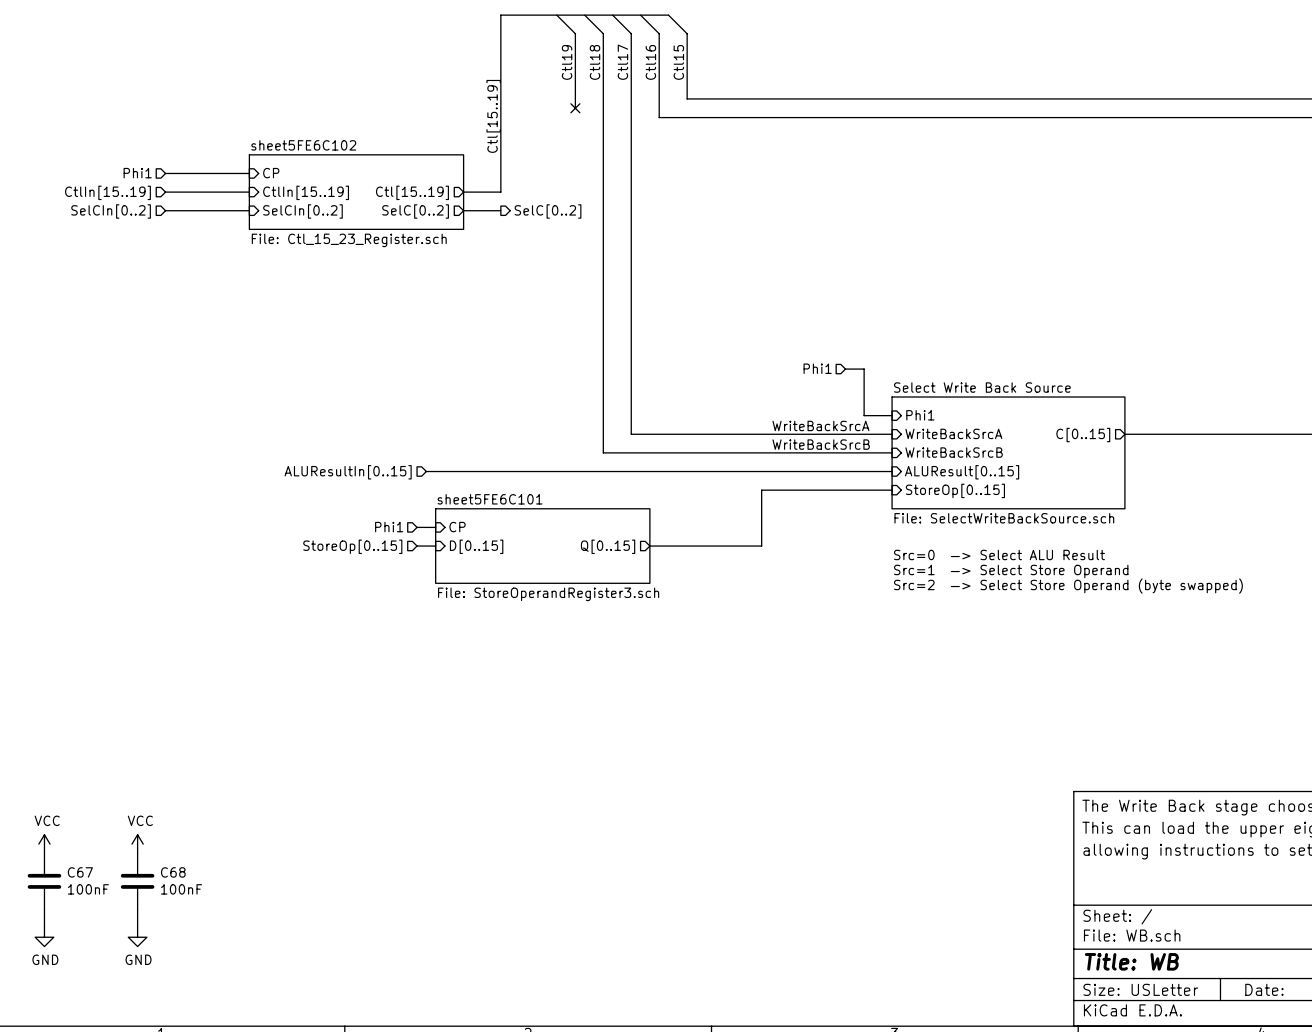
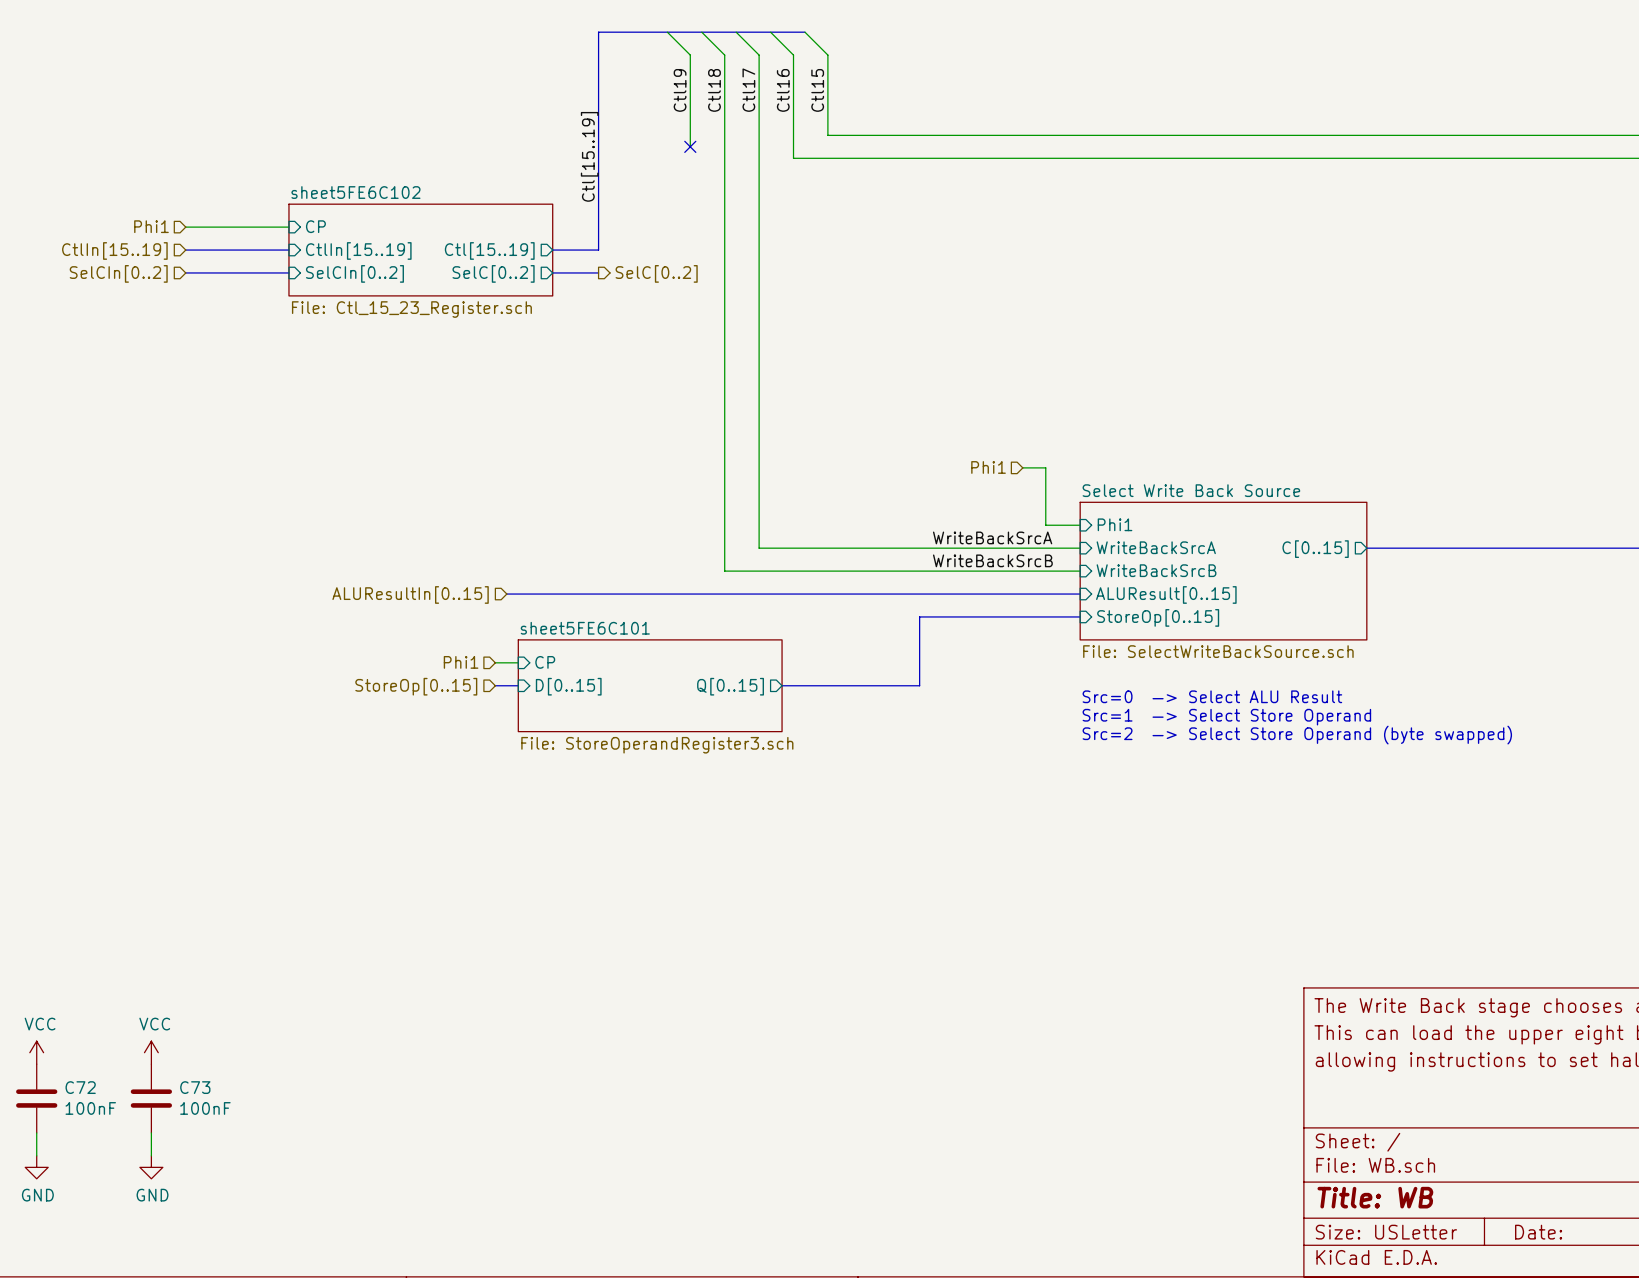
C67 name: C67 (80, 872) -> C72 (80, 1087)
C68 name: C68 (173, 872) -> C73 (195, 1087)

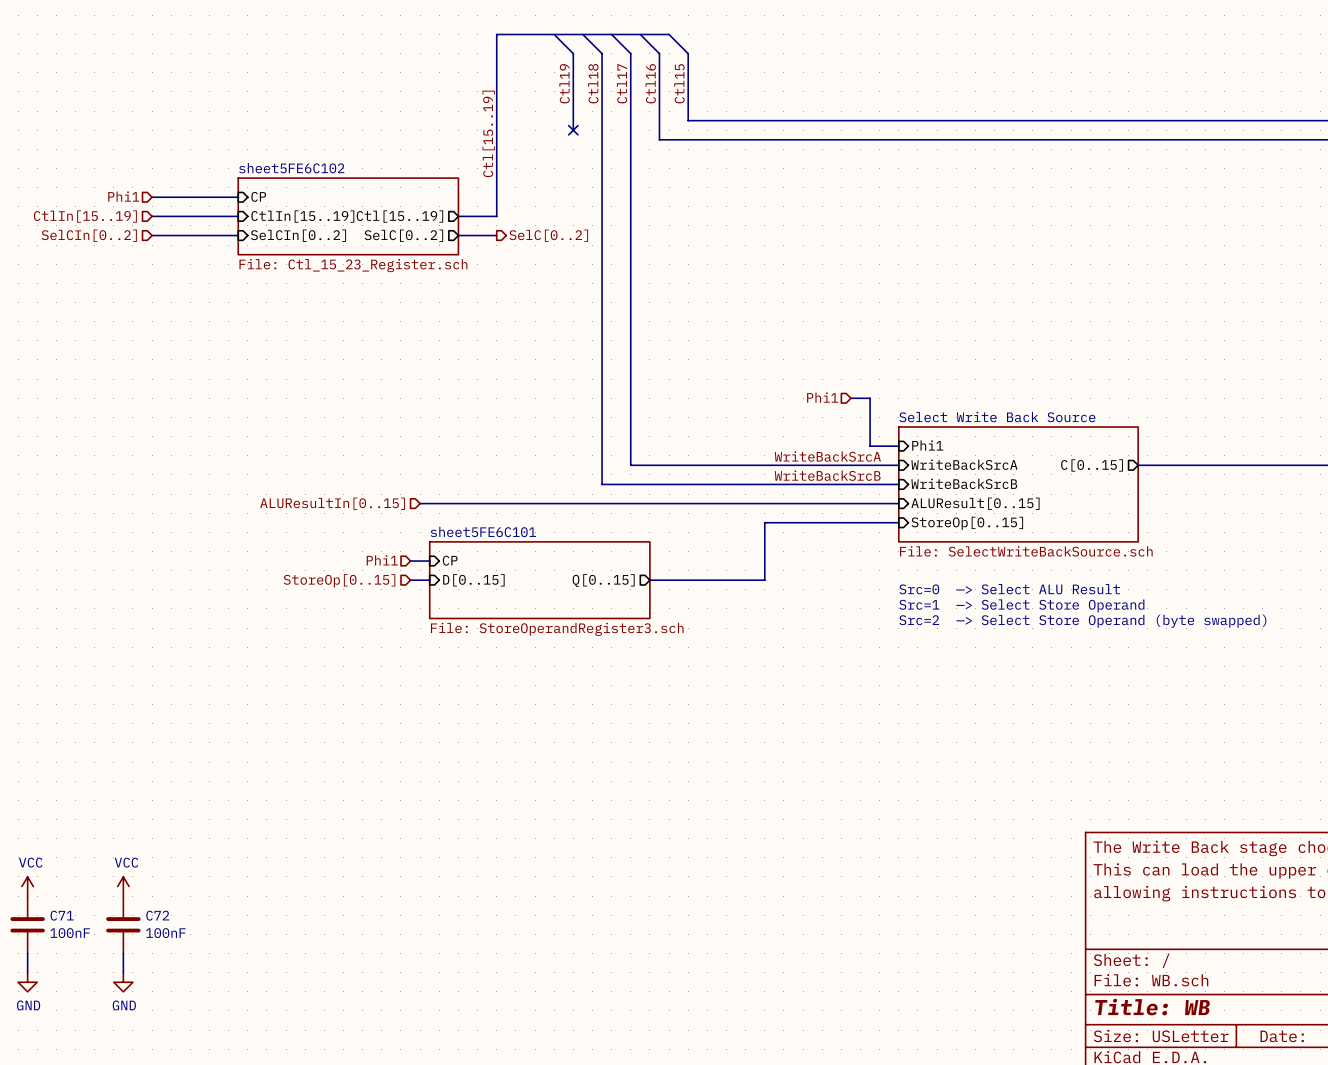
C72 name: C72 (80, 1087) -> C71 (62, 915)
C73 name: C73 (195, 1087) -> C72 (157, 915)

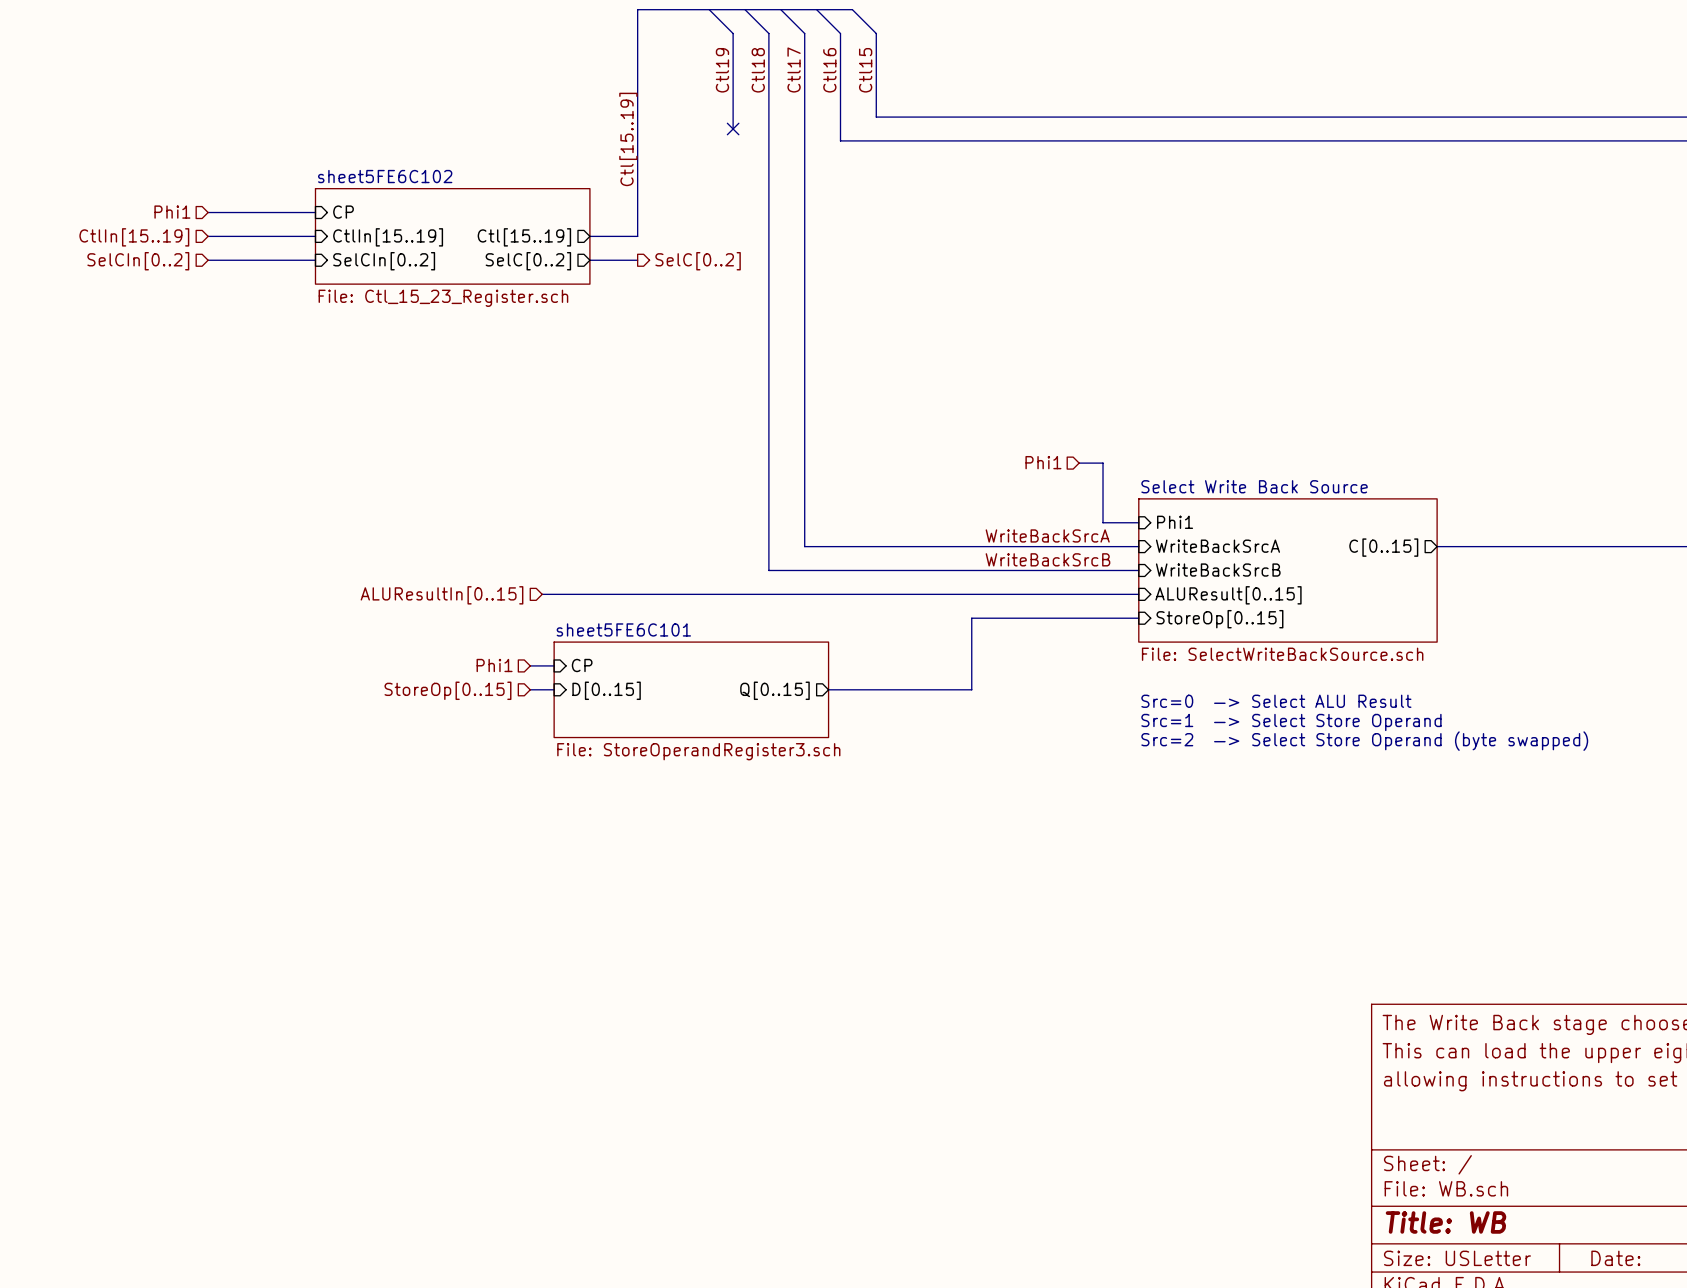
power symbol: VCC (27, 886) -> none
power symbol: VCC (123, 886) -> none
C71: 100nF (27, 924) -> none
C72: 100nF (123, 924) -> none
wire: (27, 953) (27, 972) -> none
wire: (123, 953) (123, 972) -> none
power symbol: GND (27, 982) -> none
power symbol: GND (123, 982) -> none

